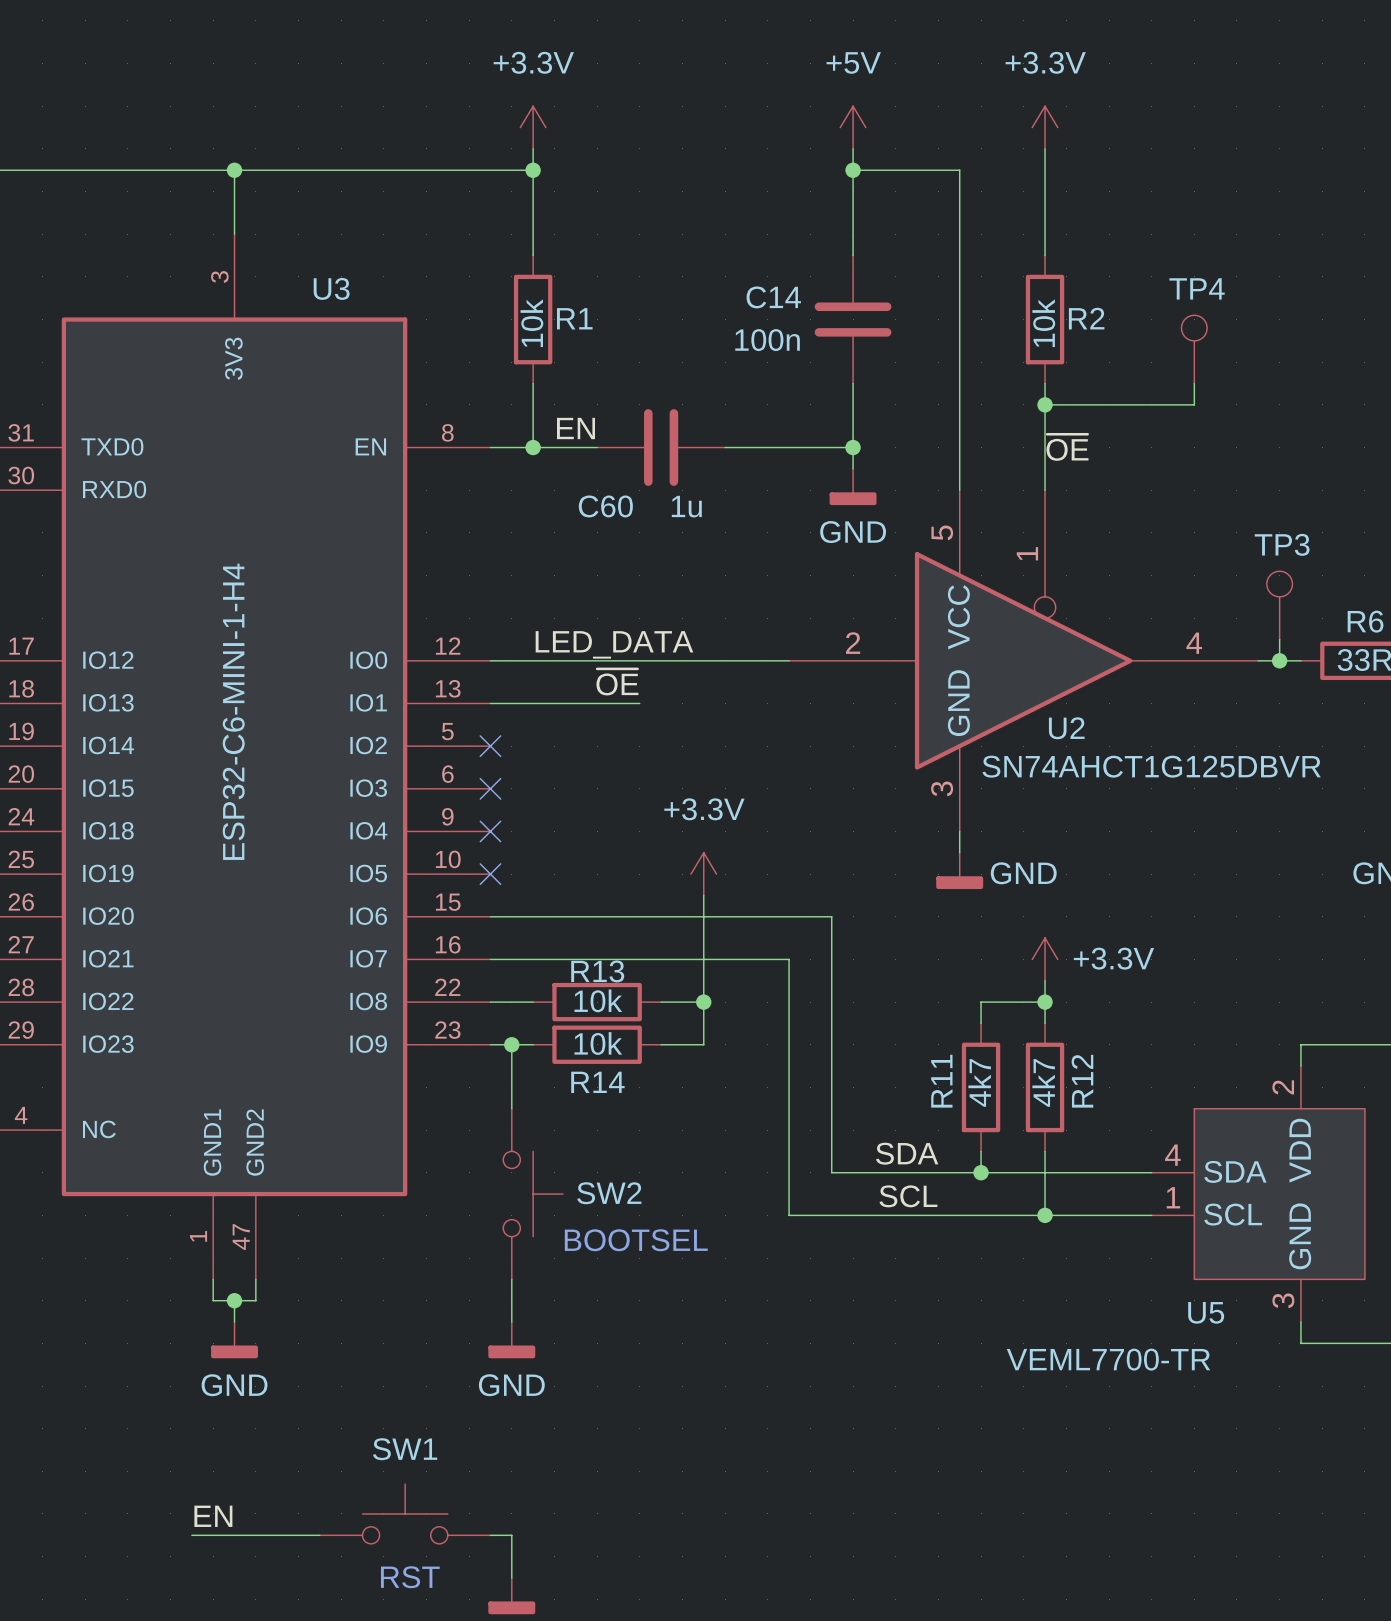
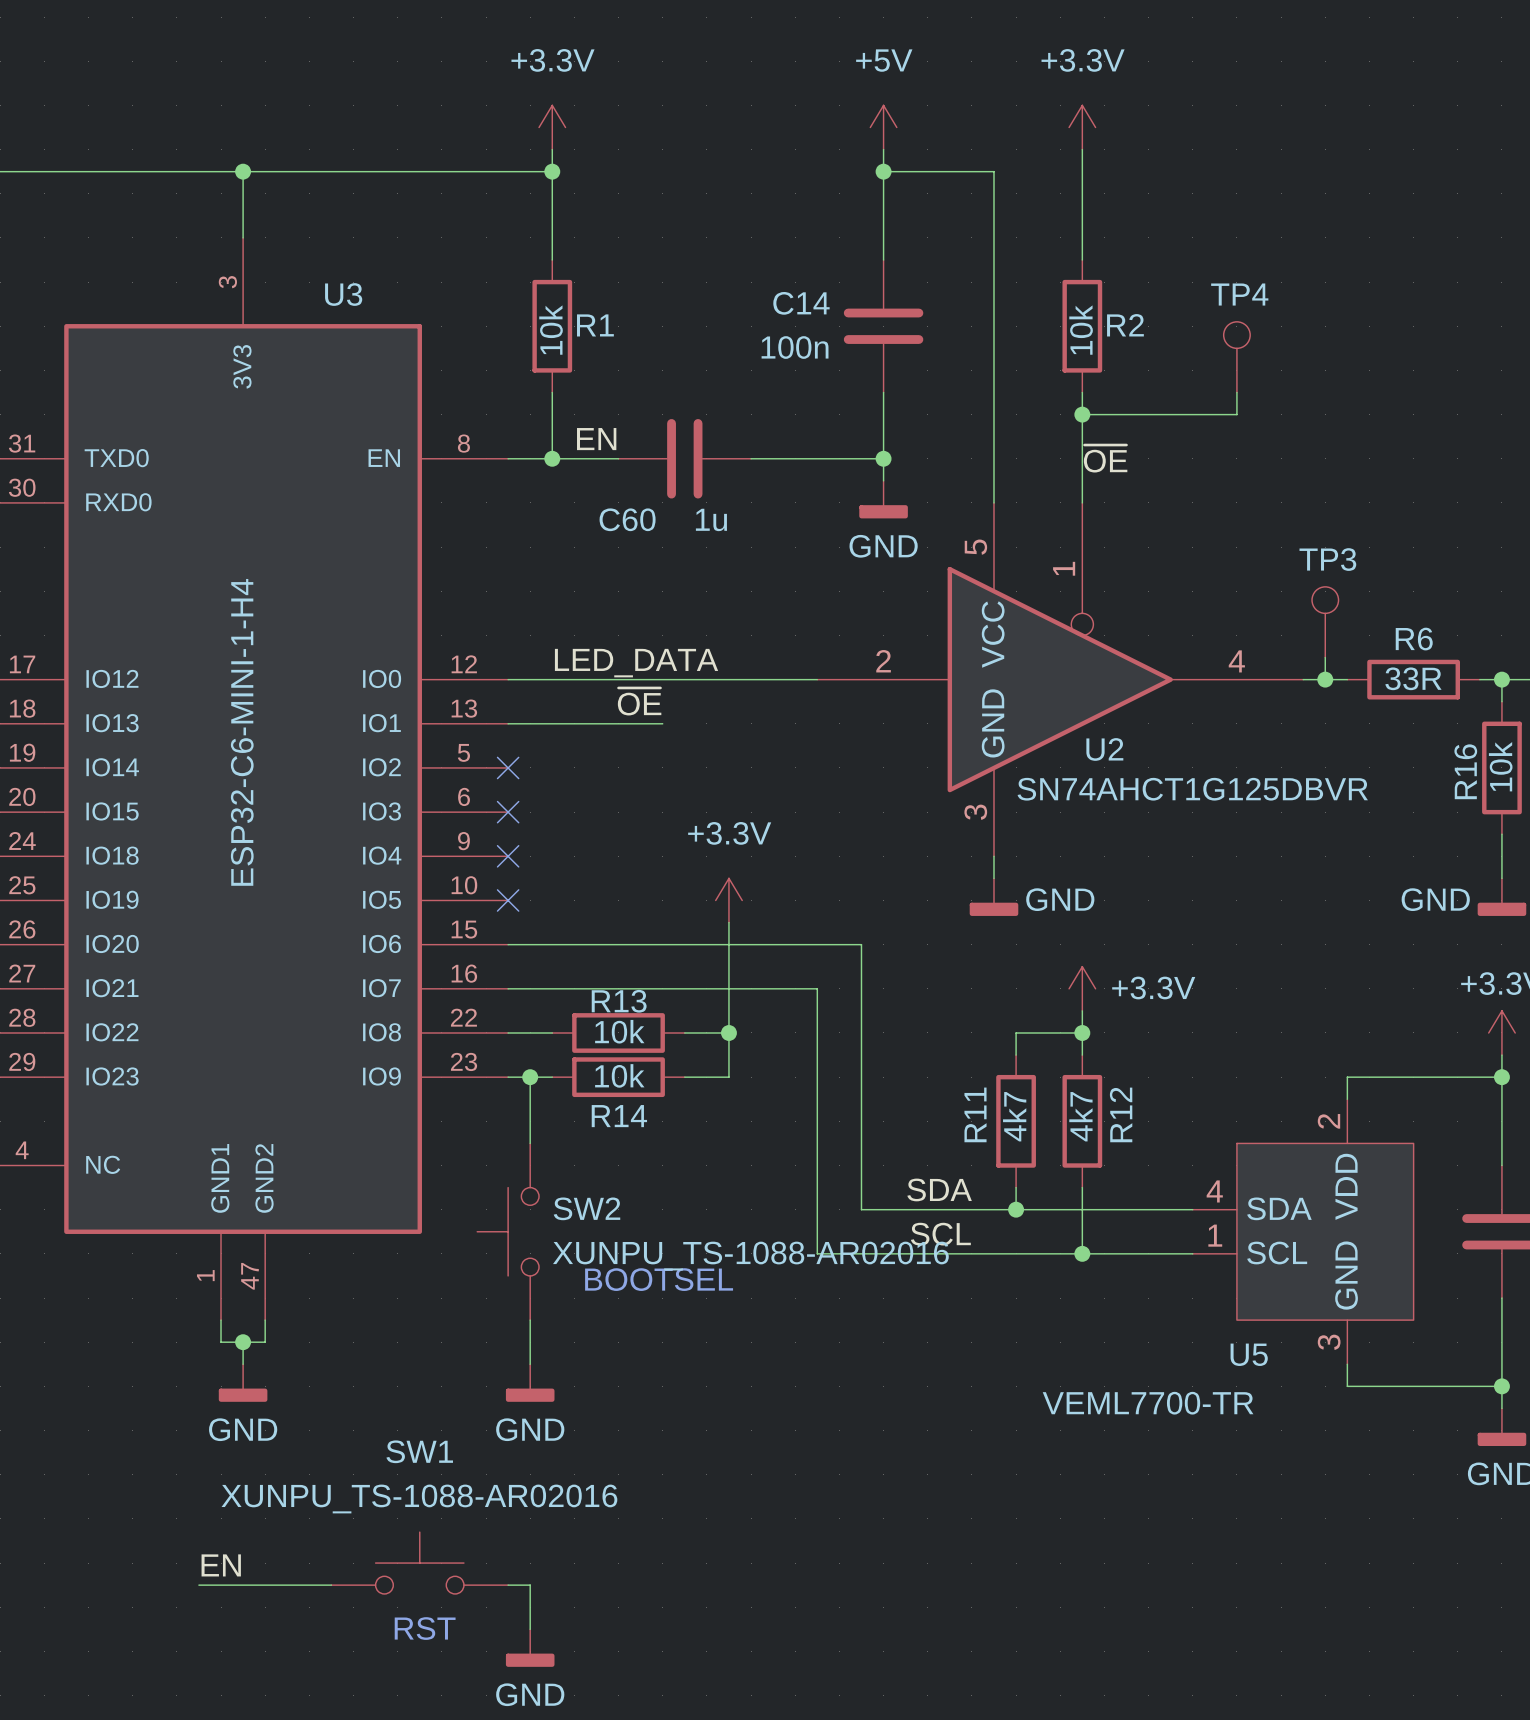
SW2 rotation: 0° (533, 1194) -> 180° (508, 1231)
SW2 value: none -> XUNPU_TS-1088-AR02016 (750, 1256)
SW1 name position: SW1 (405, 1449) -> SW1 (419, 1451)
SW1 value: none -> XUNPU_TS-1088-AR02016 (419, 1498)

